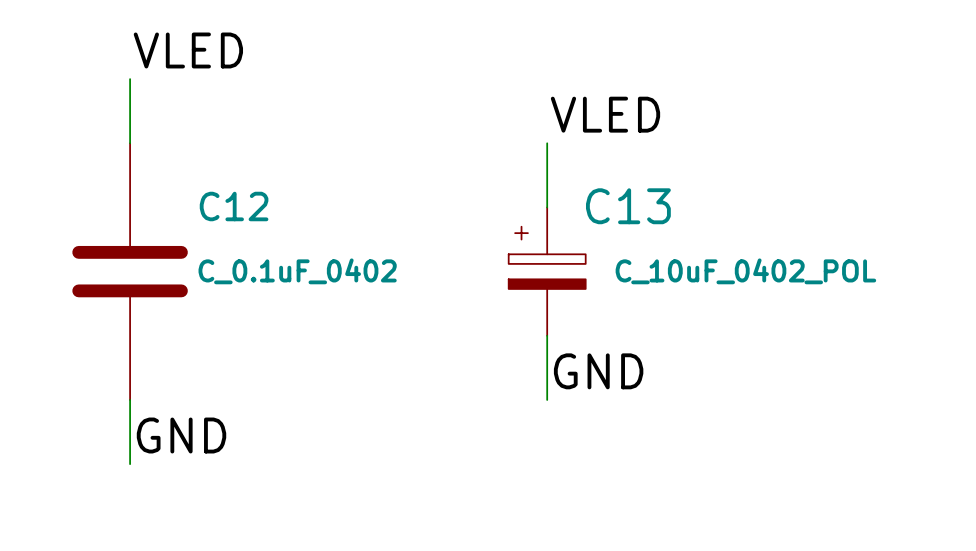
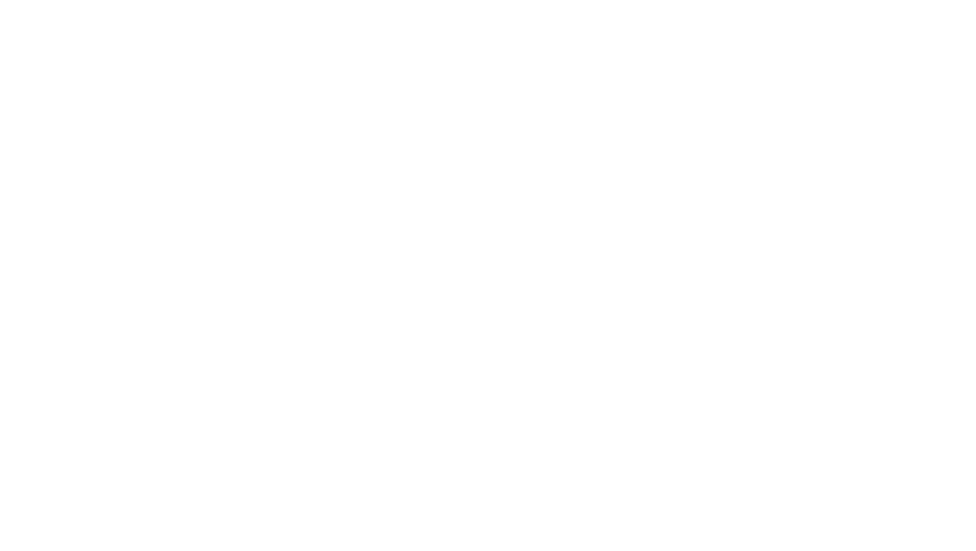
label: VLED (188, 50) -> none
wire: (130, 79) (130, 143) -> none
label: VLED (605, 114) -> none
wire: (547, 143) (547, 207) -> none
C12: C_0.1uF_0402 (130, 271) -> none
C13: C_10uF_0402_POL (547, 271) -> none
wire: (547, 335) (547, 399) -> none
label: GND (598, 371) -> none
wire: (130, 399) (130, 464) -> none
label: GND (181, 435) -> none

